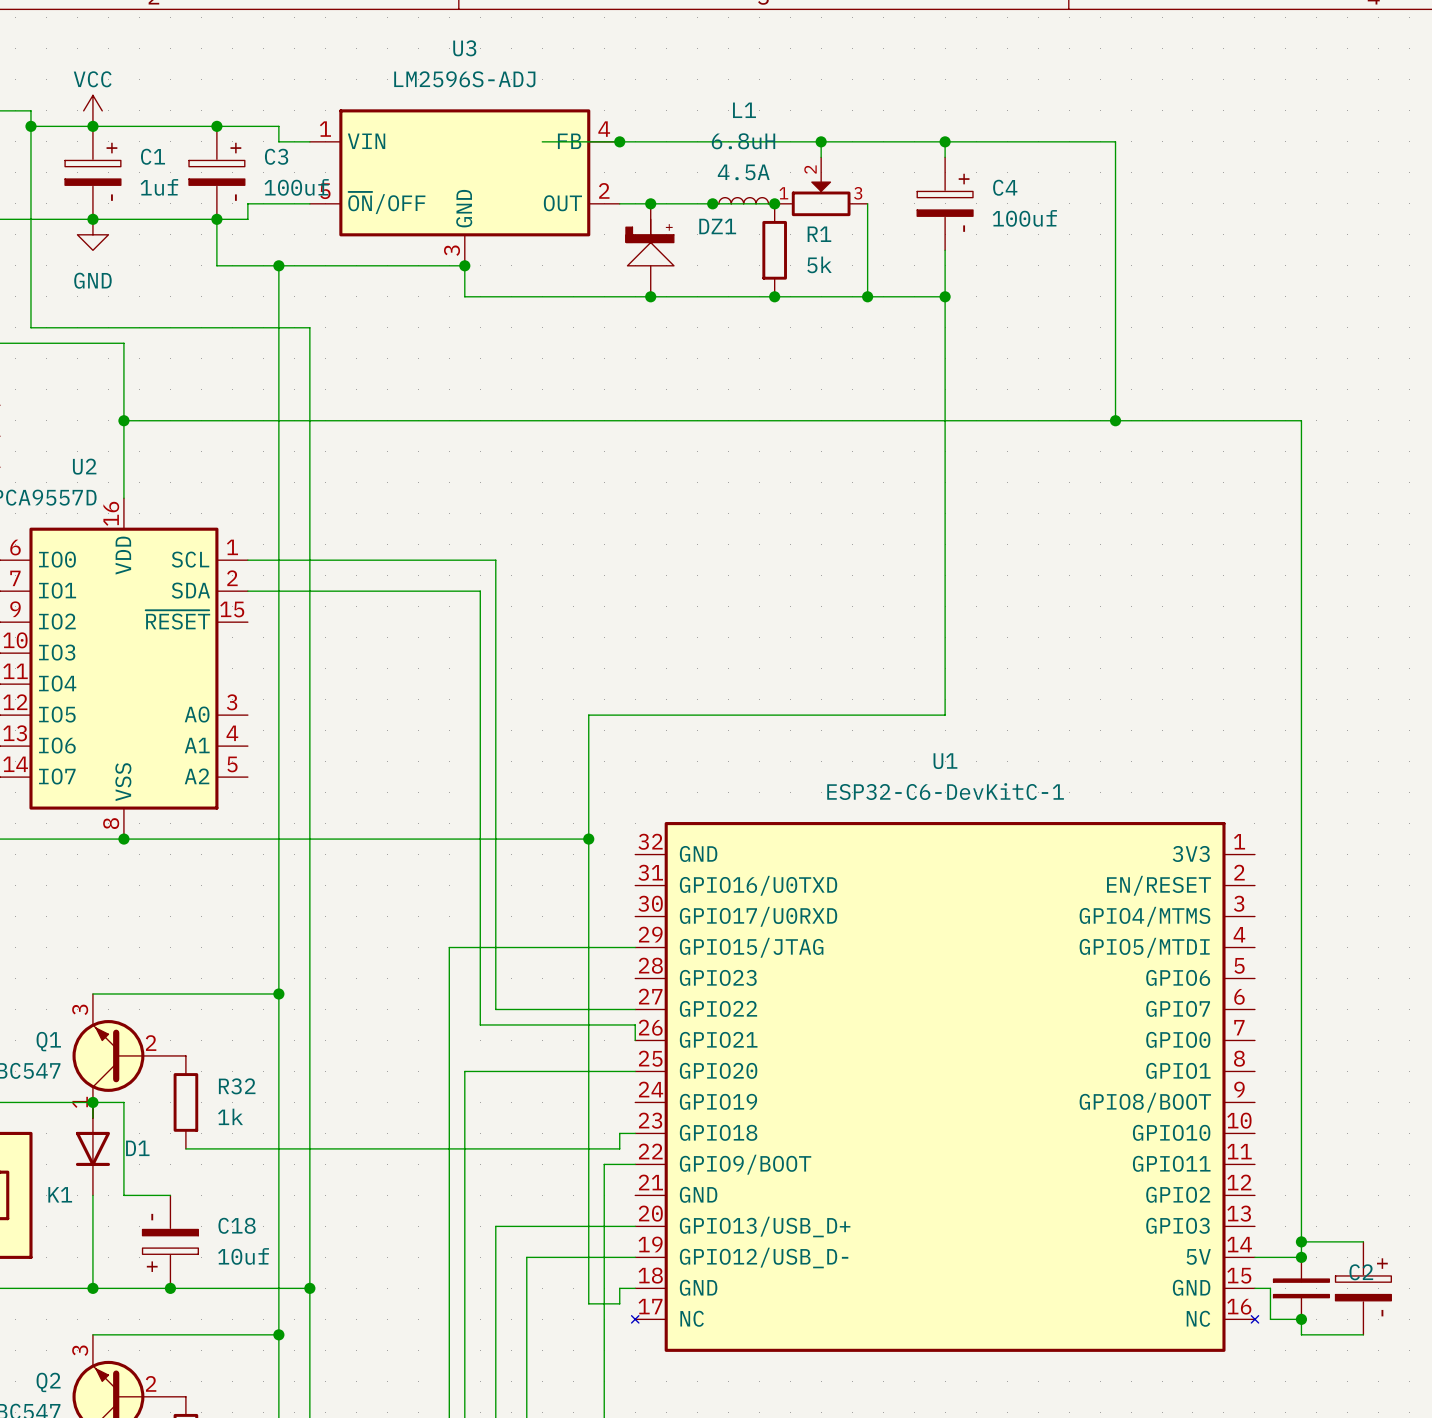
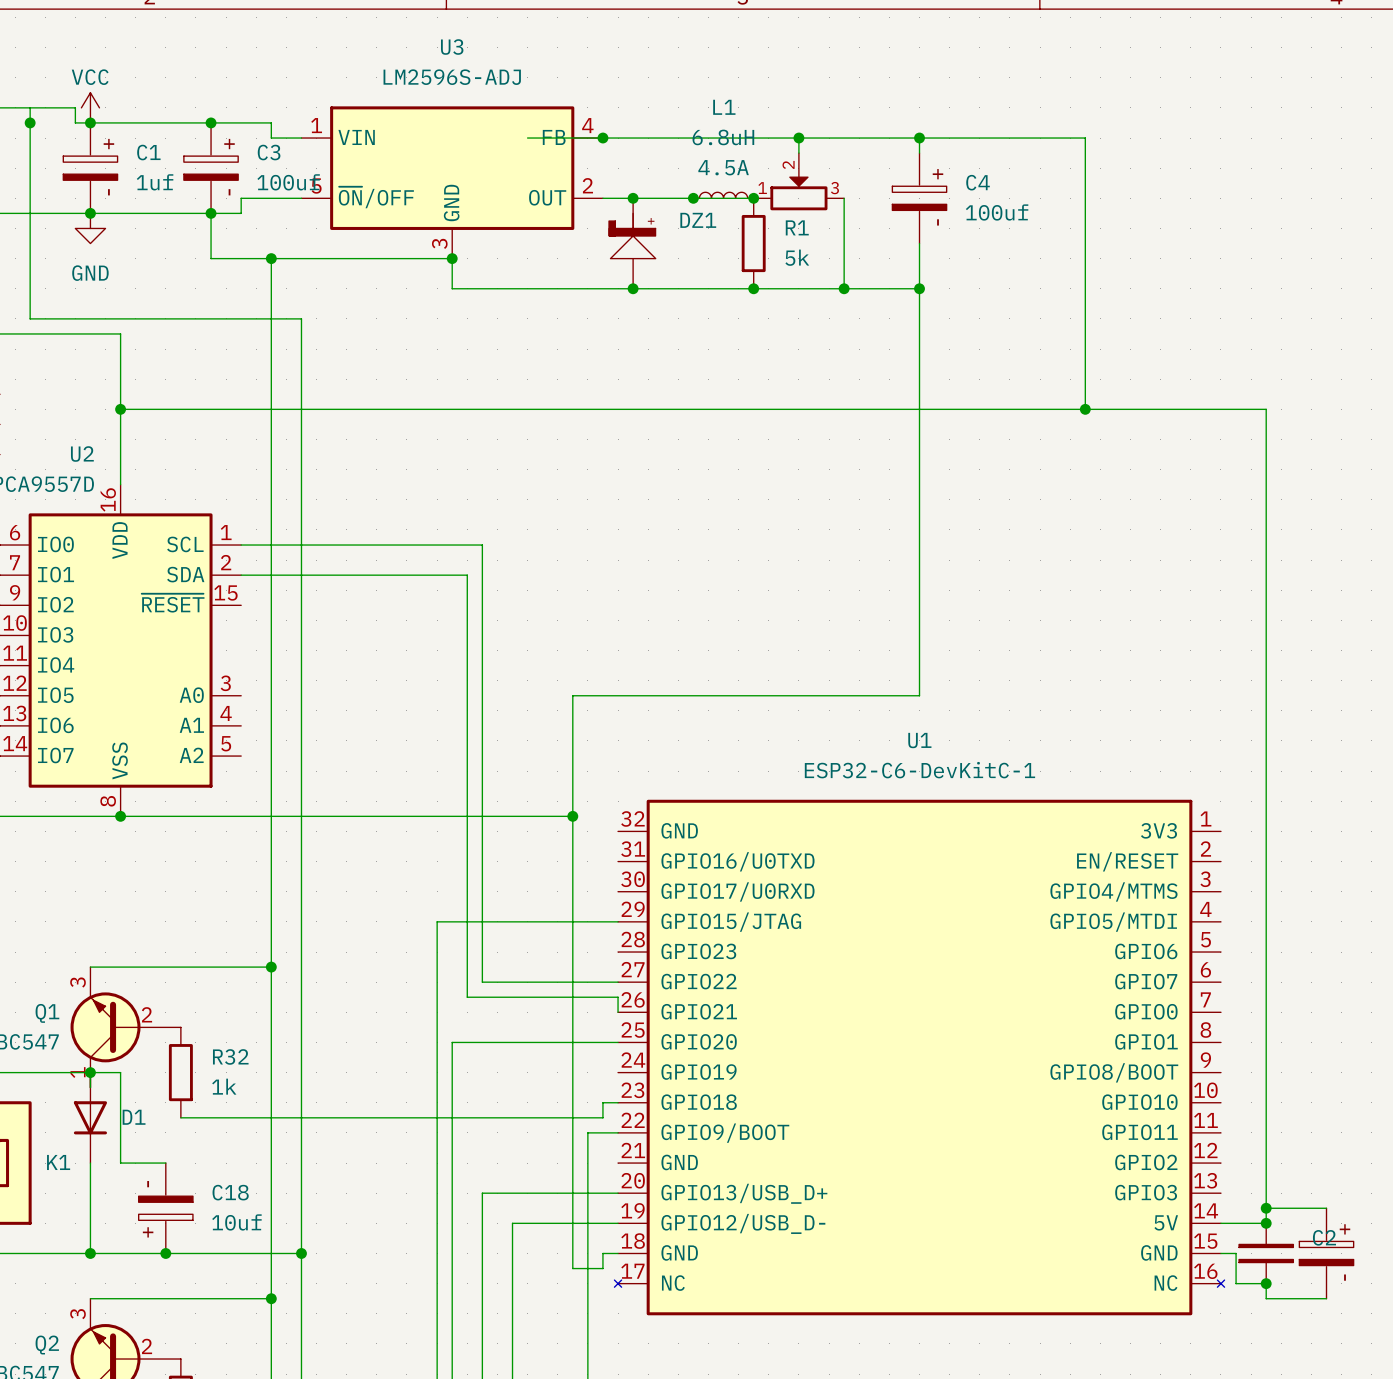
wire: (30, 126) (77, 126) -> (30, 107) (75, 107) (75, 122)

